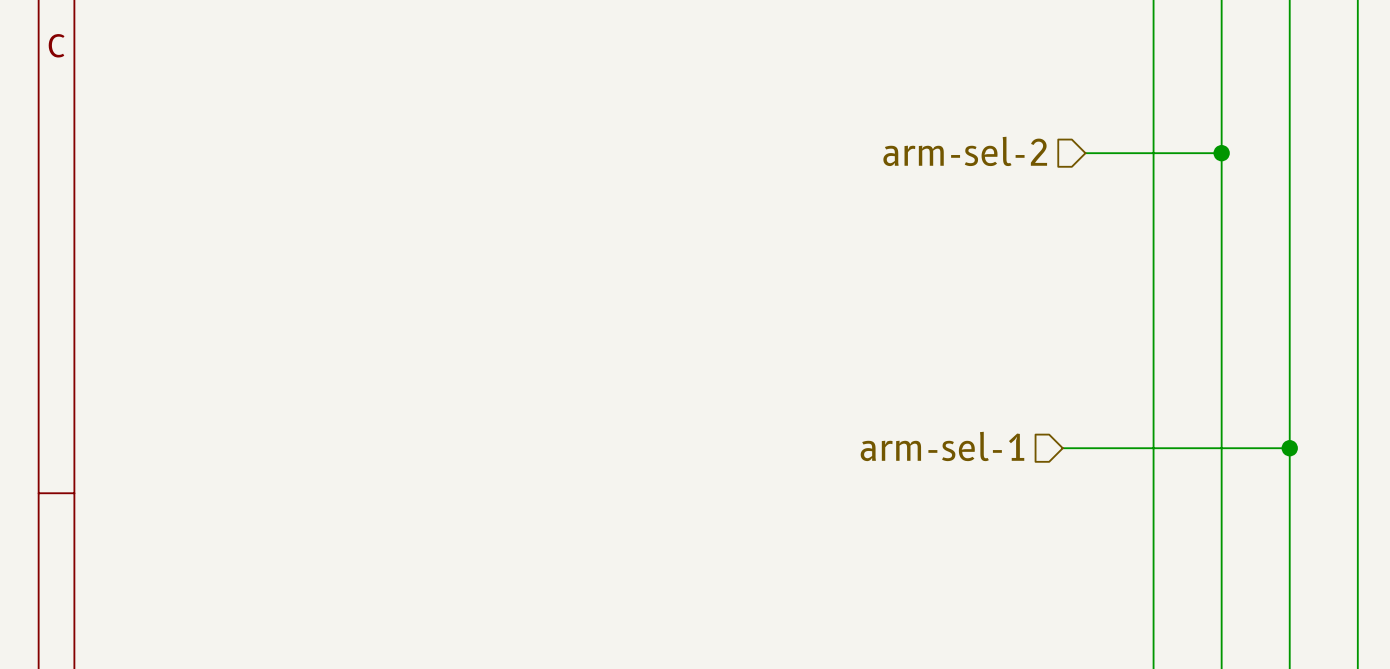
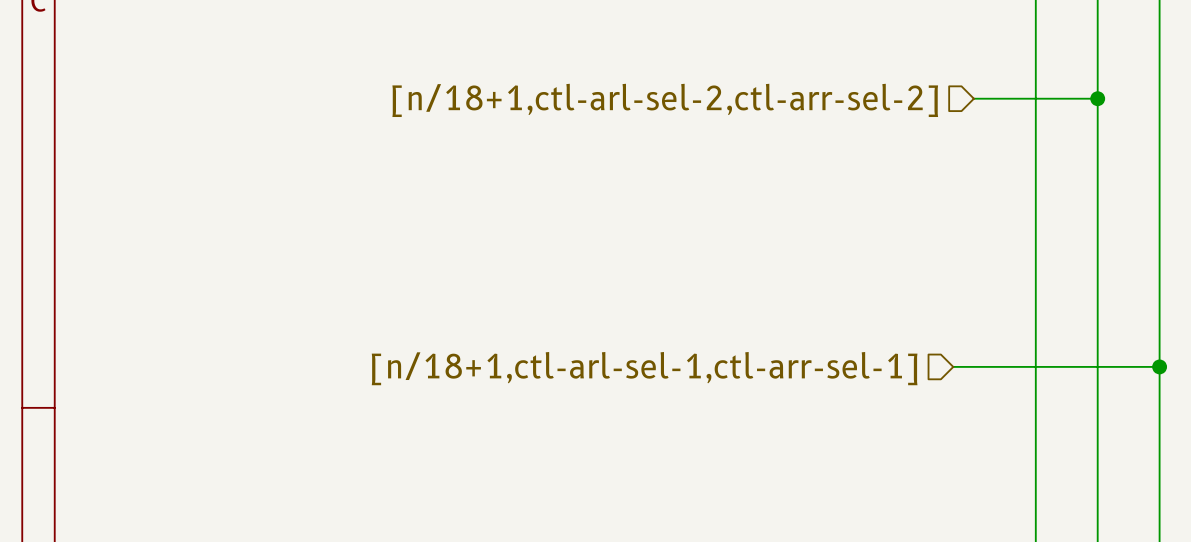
hierarchical label: arm-sel-2 (965, 151) -> [n/18+1,ctl-arl-sel-2,ctl-arr-sel-2] (665, 100)
hierarchical label: arm-sel-1 (942, 446) -> [n/18+1,ctl-arl-sel-1,ctl-arr-sel-1] (644, 368)

